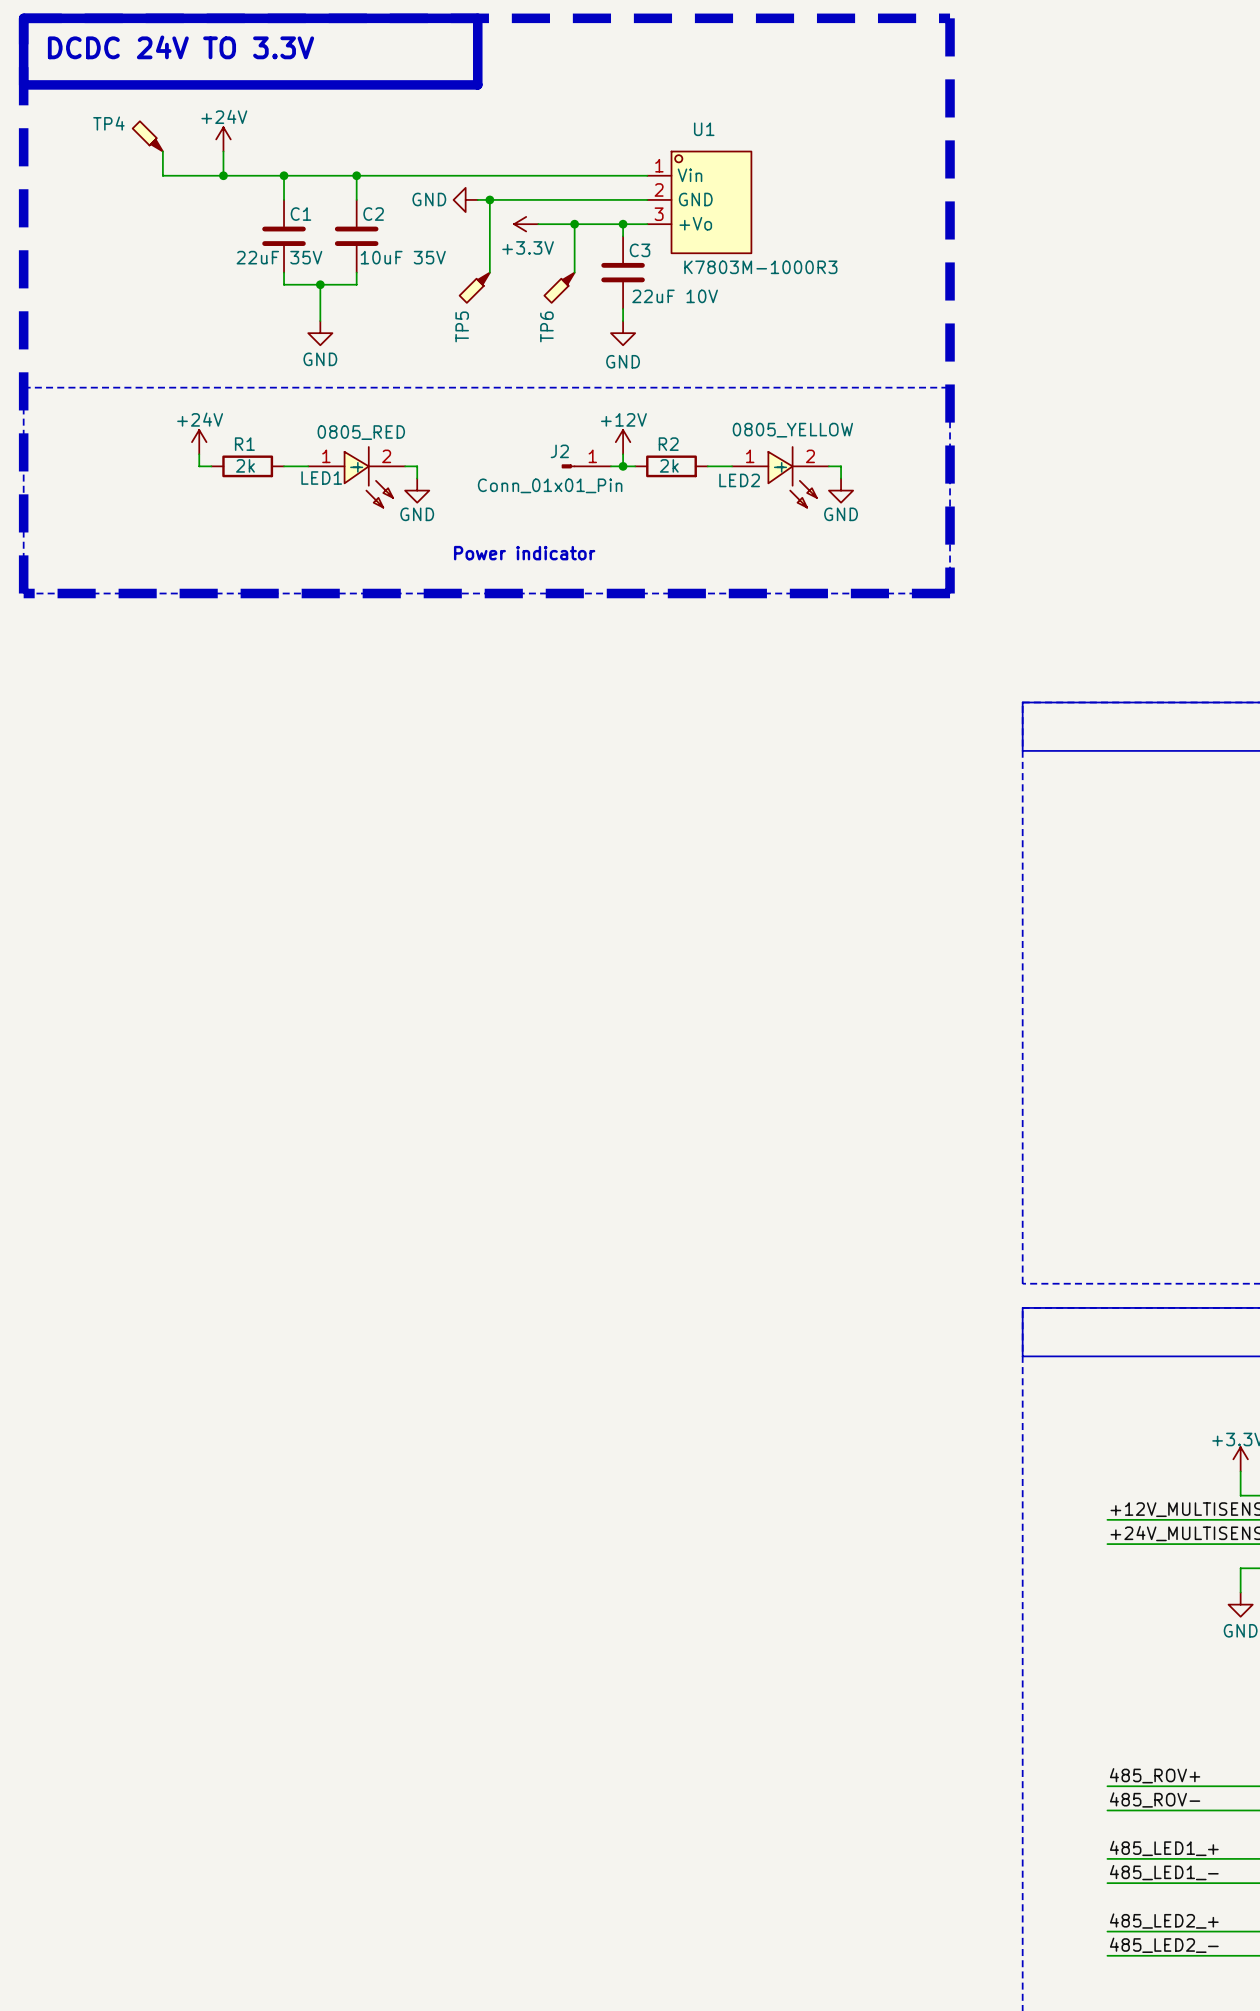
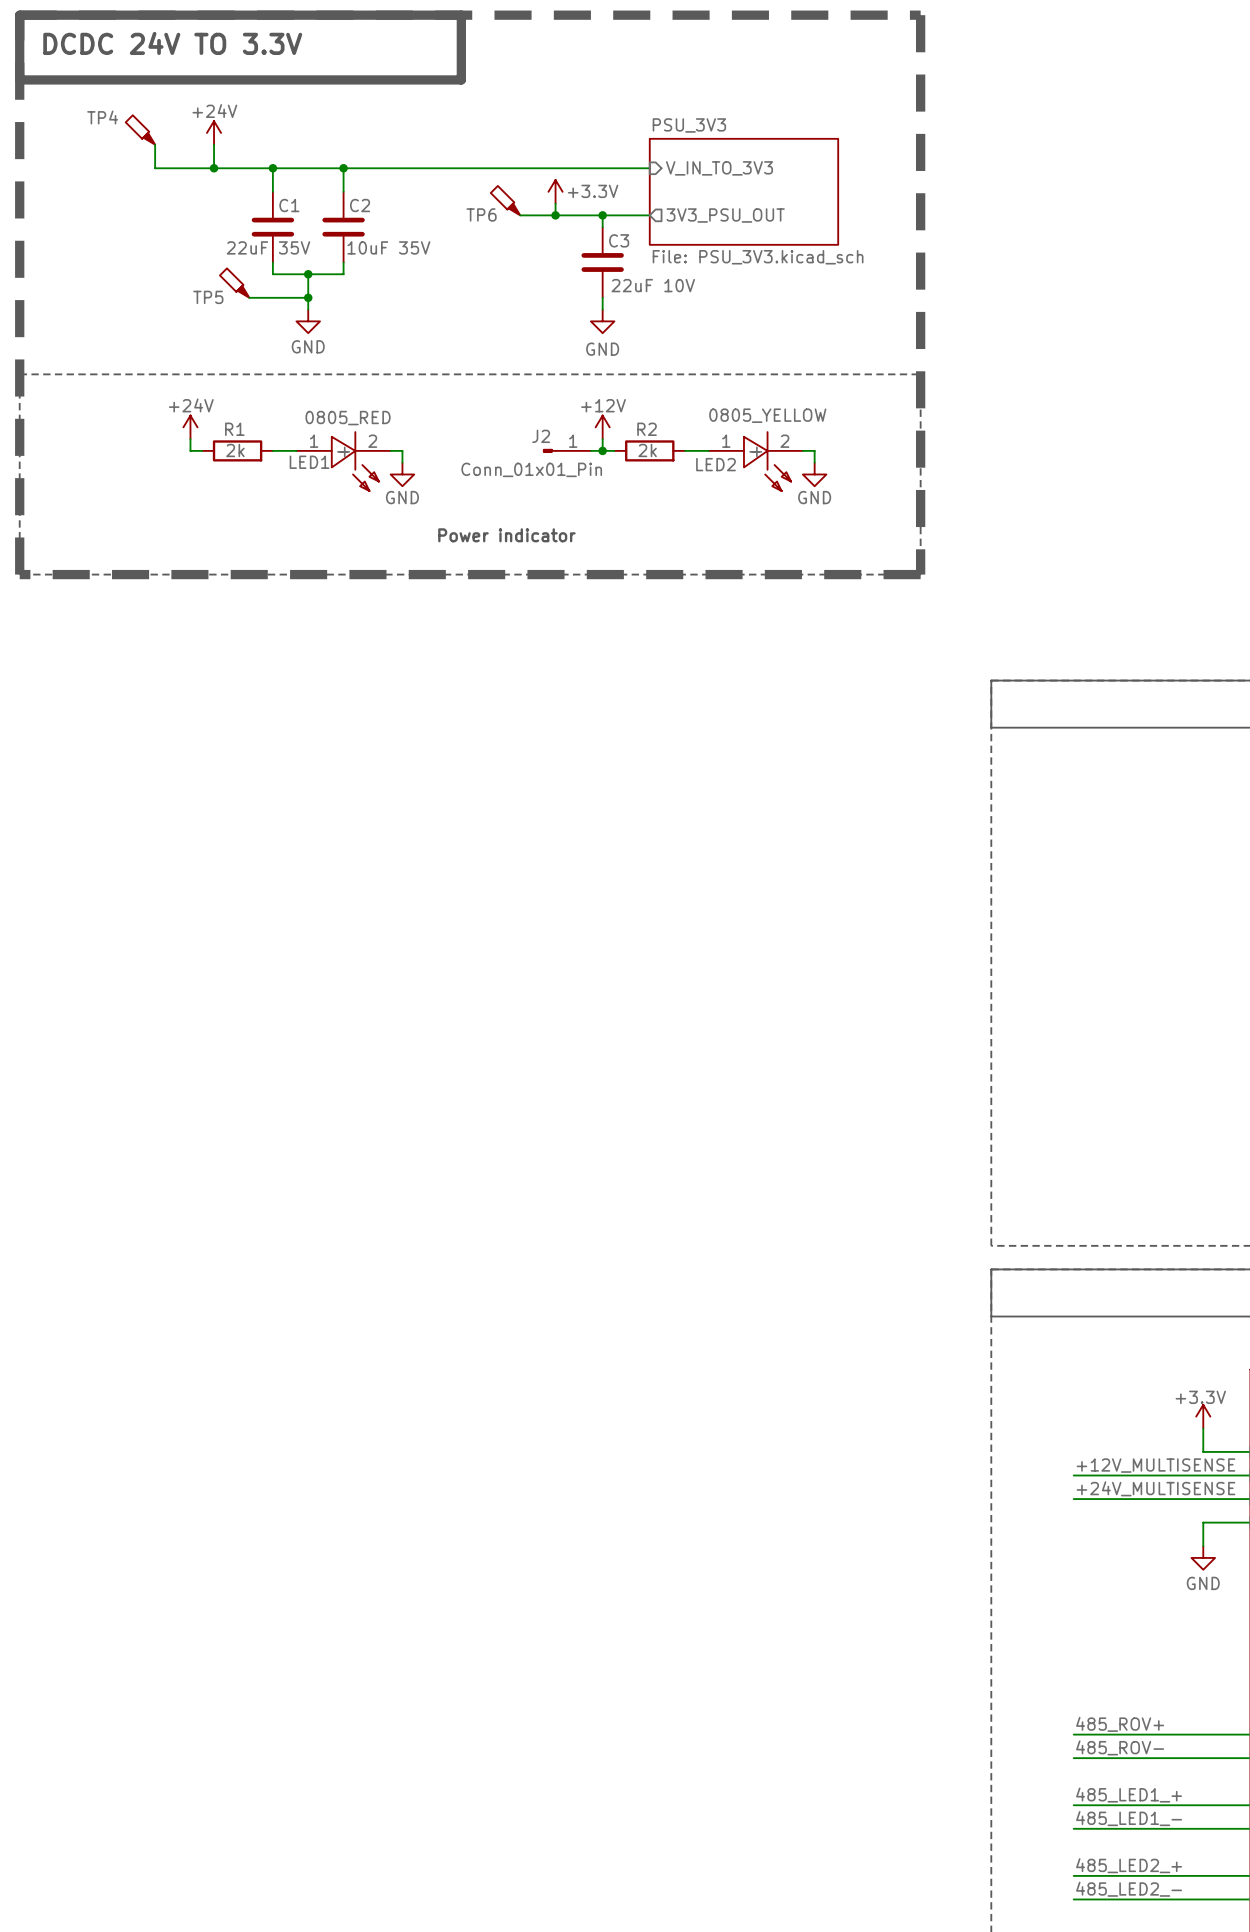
sheet pin: none -> V_IN_TO_3V3 (719, 168)
power symbol: GND (465, 199) -> none
wire: (477, 199) (647, 199) -> none
wire: (489, 199) (489, 272) -> none
junction: (489, 199) -> none
sheet PSU_3V3: none -> File: PSU_3V3.kicad_sch (743, 191)
U1: K7803M-1000R3 (699, 202) -> none
power symbol rotation: 0° (526, 224) -> 90° clockwise (555, 191)
power symbol position: +3.3V (526, 224) -> +3.3V (555, 191)
wire: (574, 224) (574, 272) -> (555, 215) (555, 203)
sheet pin: none -> 3V3_PSU_OUT (725, 215)
power symbol text position: +3.3V (528, 247) -> +3.3V (593, 191)
TP5 rotation: 0° (474, 287) -> 90° clockwise (234, 283)
TP5 position: (474, 287) -> (234, 283)
TP6 rotation: 0° (559, 287) -> 90° clockwise (505, 200)
TP6 position: (559, 287) -> (505, 200)
wire: none -> (249, 297) (308, 297)
junction: none -> (308, 297)
TP5 name position: TP5 (462, 326) -> TP5 (208, 297)
TP6 name position: TP6 (546, 326) -> TP6 (481, 214)

